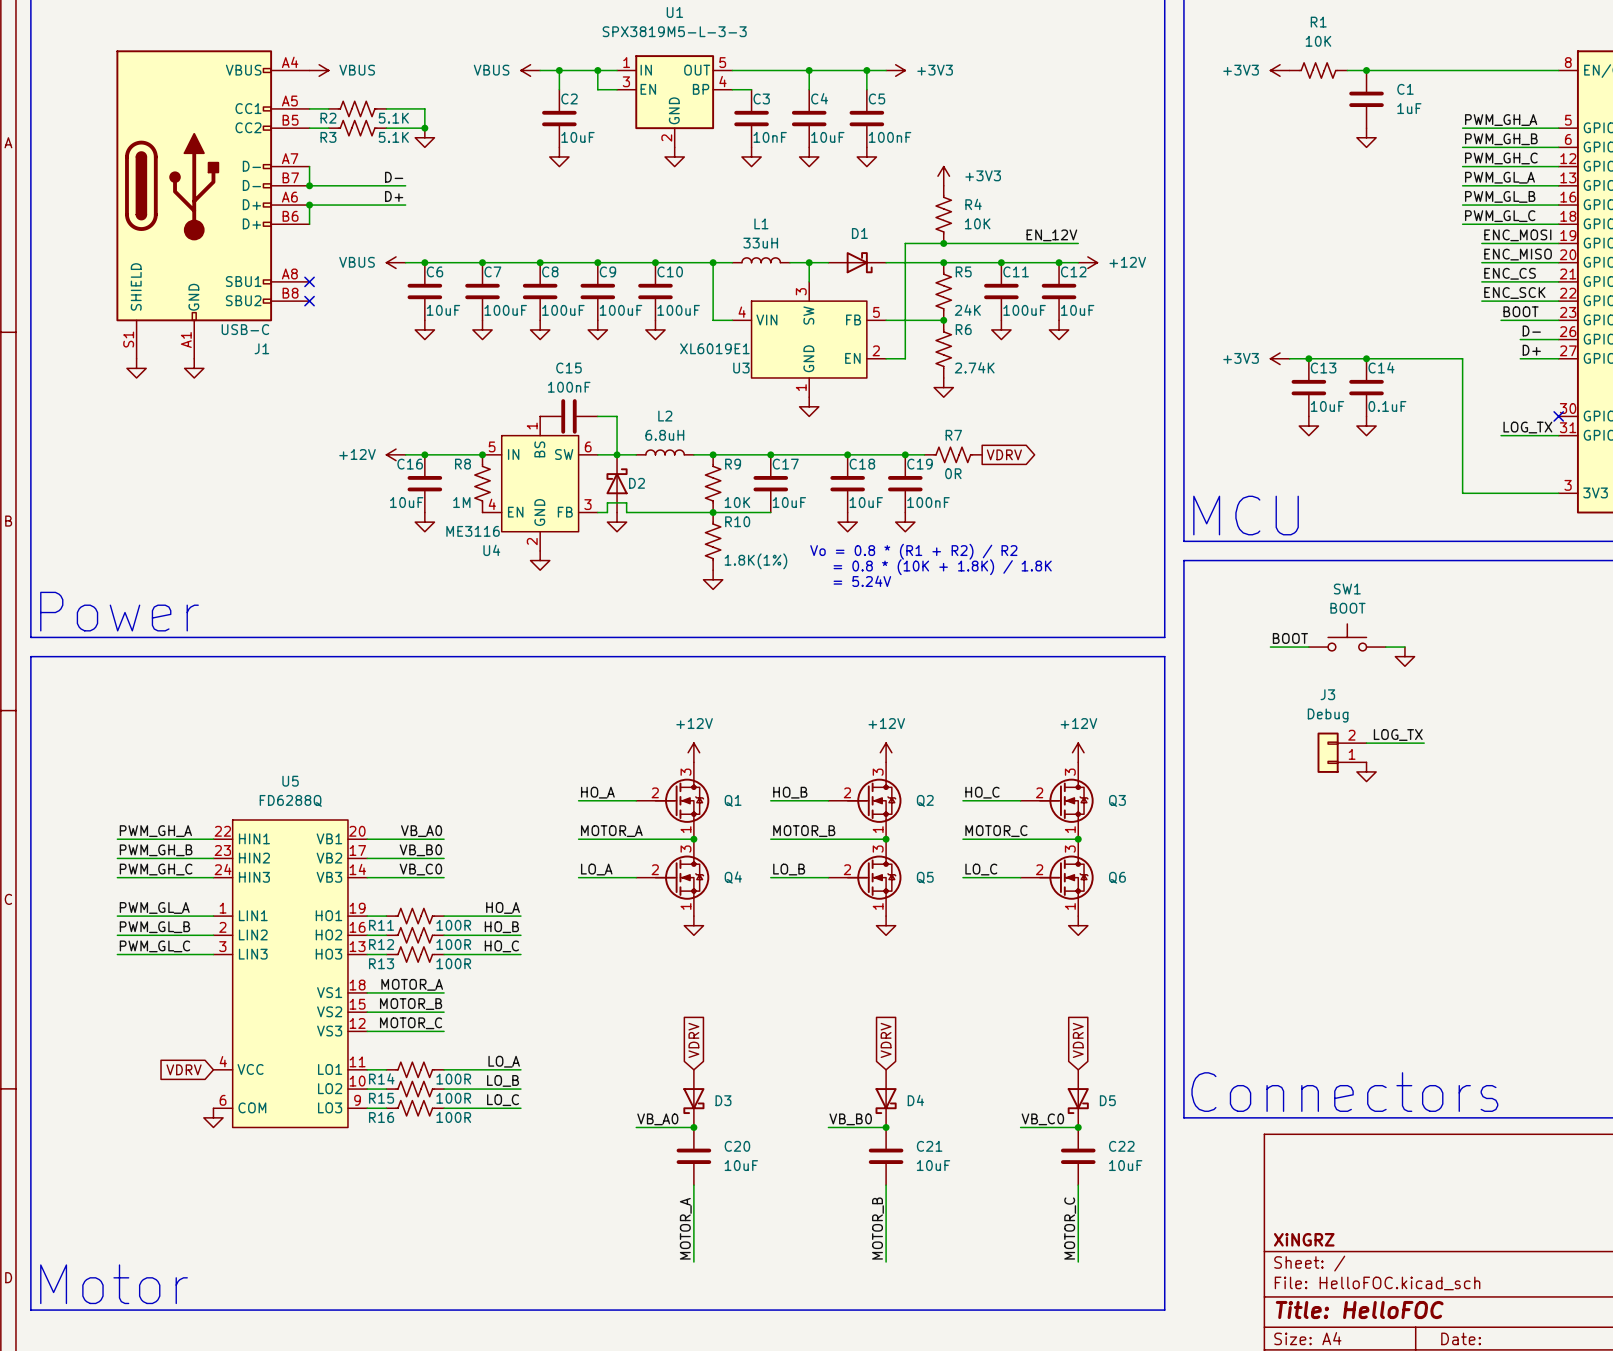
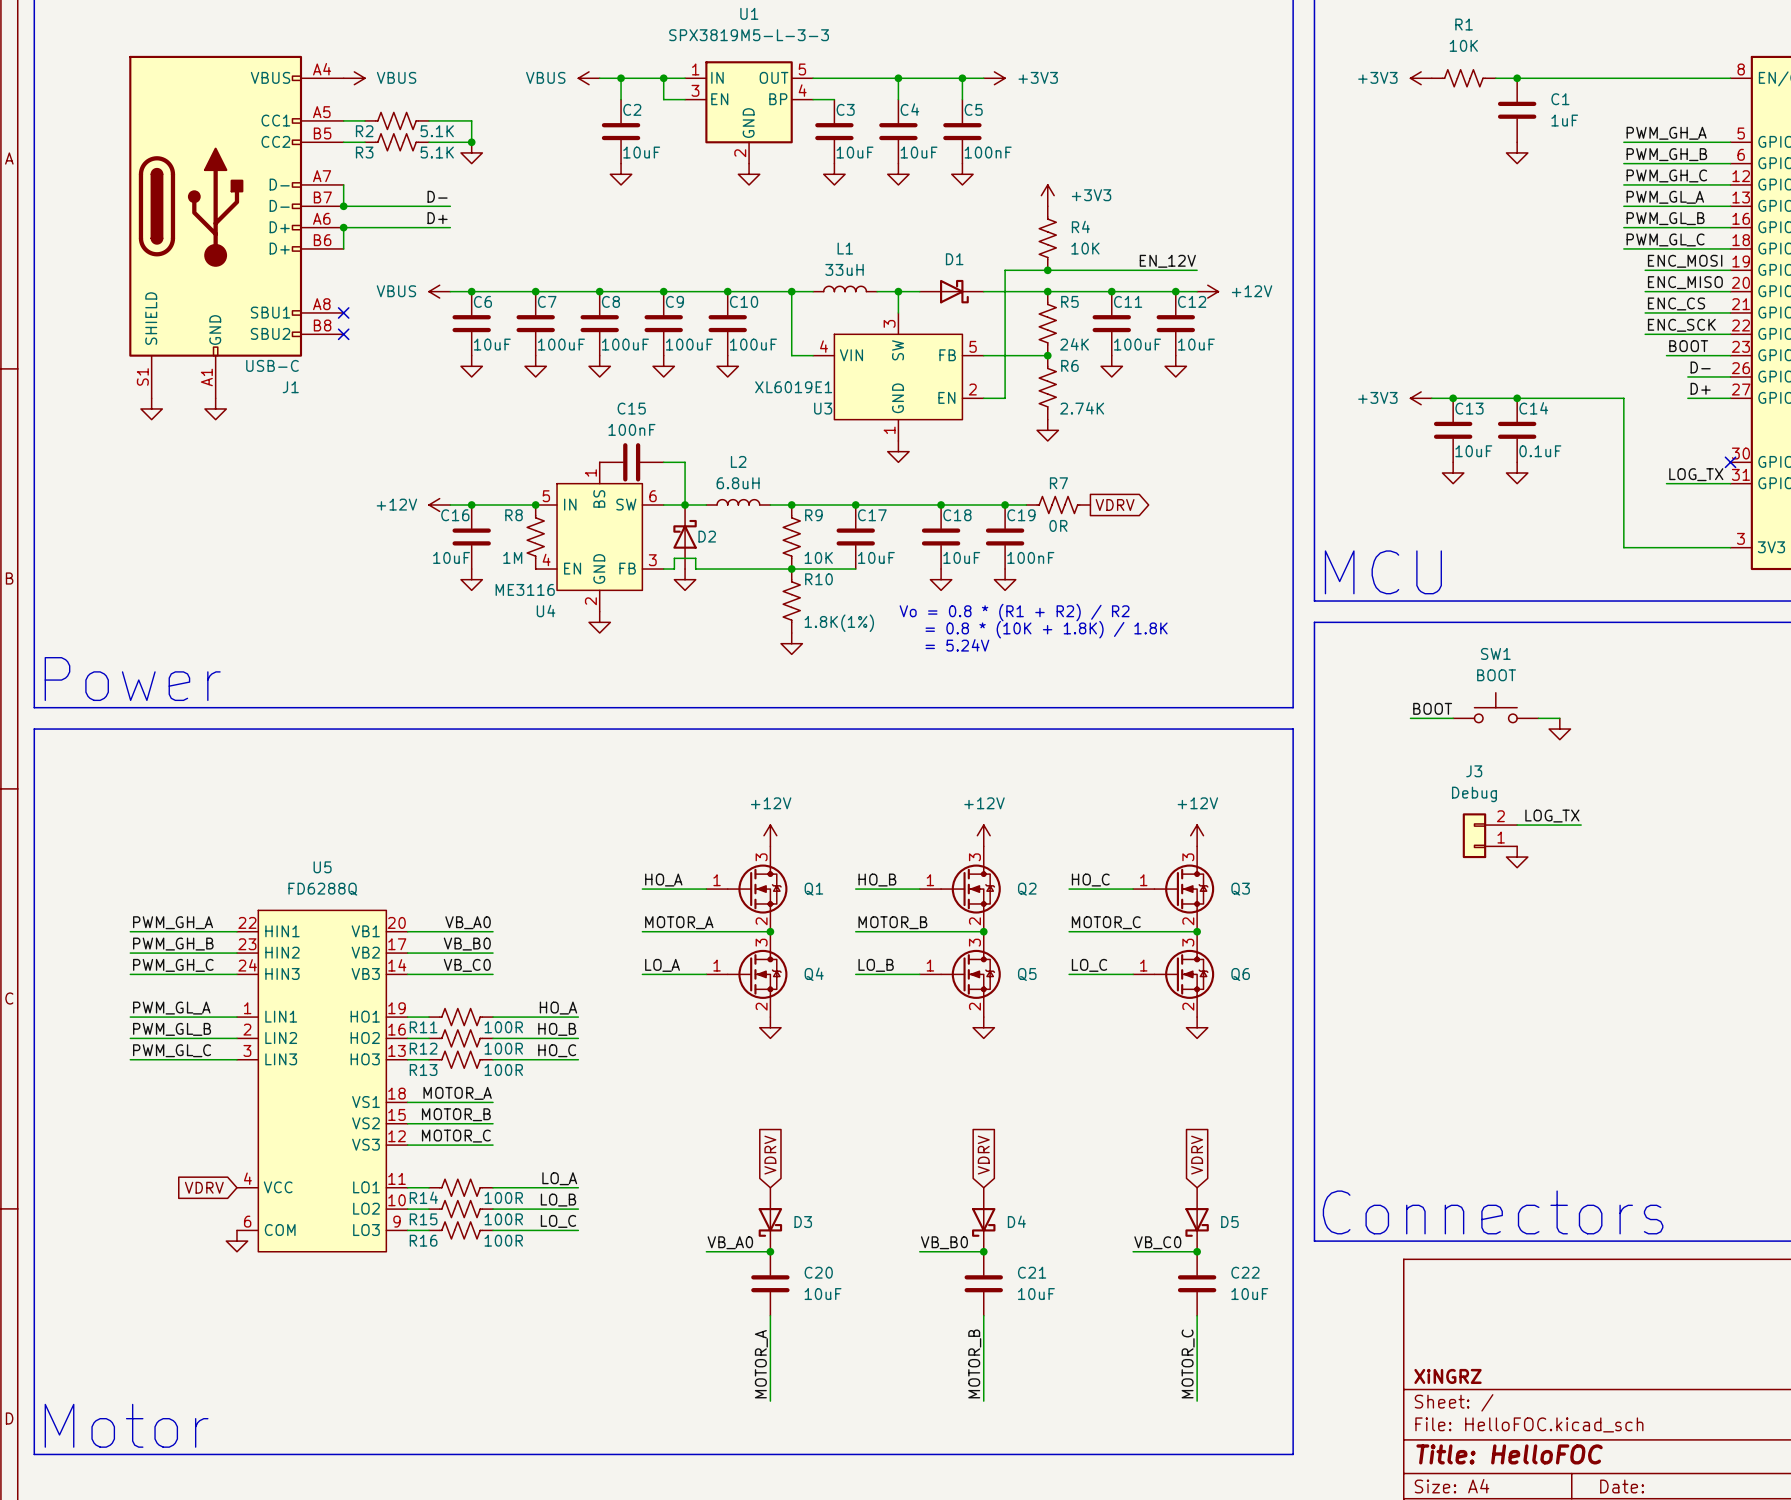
C3 value: 10nF (770, 137) -> 10uF (855, 152)
Q1 symbol: [636, 762, 710, 840] -> [706, 846, 788, 932]
Q2 symbol: [828, 762, 902, 840] -> [919, 846, 1001, 932]
Q3 symbol: [1020, 762, 1094, 840] -> [1133, 846, 1215, 932]
Q4 symbol: [636, 839, 710, 917] -> [706, 931, 788, 1018]
Q5 symbol: [828, 839, 902, 917] -> [919, 931, 1001, 1018]
Q6 symbol: [1020, 839, 1094, 917] -> [1133, 931, 1215, 1018]

